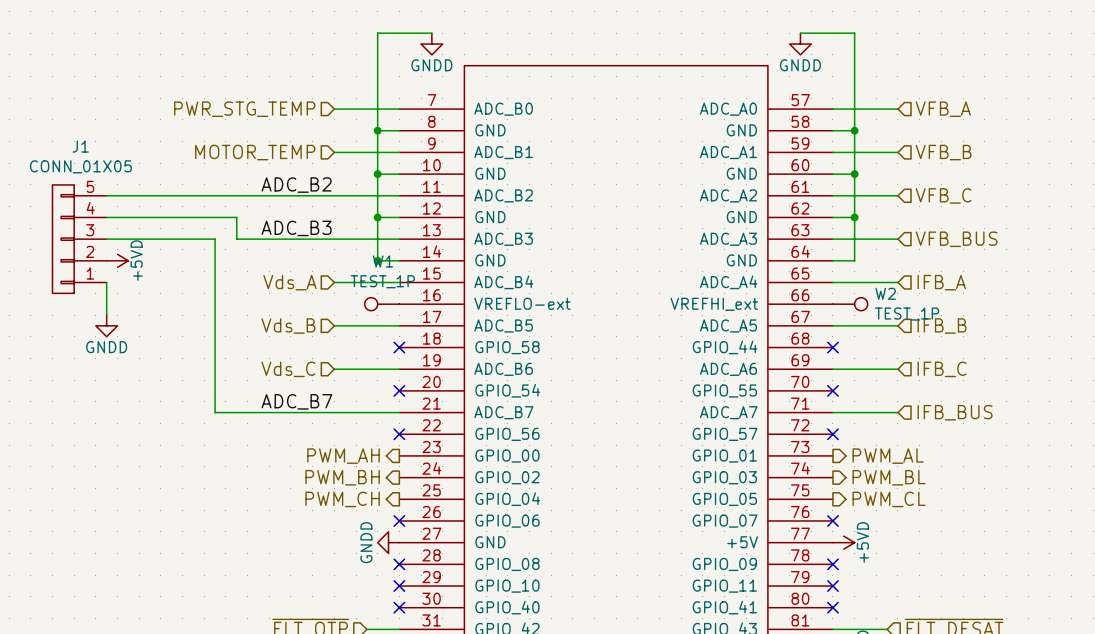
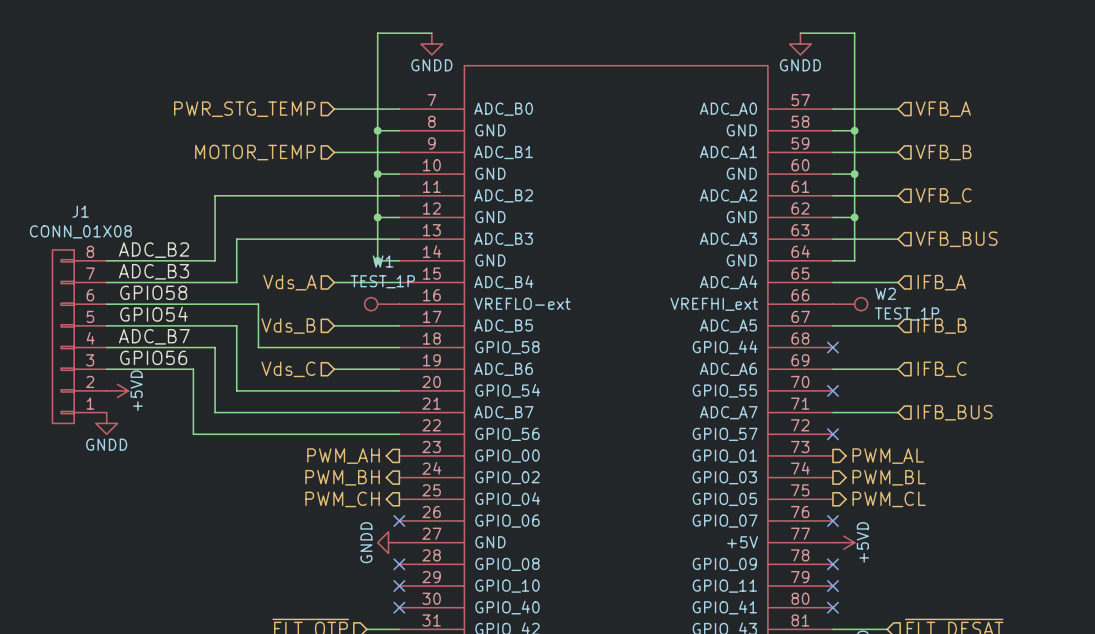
J1 name position: J1 (80, 146) -> J1 (80, 211)
J1 value: CONN_01X05 (80, 166) -> CONN_01X08 (80, 231)
J1 symbol: [52, 184, 107, 294] -> [52, 249, 107, 424]
label: ADC_B2 (296, 185) -> none
wire: (106, 195) (215, 195) -> (215, 239) (215, 195)
wire: (106, 217) (236, 217) (236, 239) -> (106, 282) (236, 282) (236, 239)
label: ADC_B3 (296, 228) -> none
wire: (106, 239) (215, 239) -> (106, 347) (215, 347)
label: none -> ADC_B2 (153, 250)
power symbol position: +5VD (117, 260) -> +5VD (117, 390)
wire: (215, 260) (215, 347) -> (215, 260) (106, 260)
label: none -> ADC_B3 (153, 271)
wire: (106, 282) (106, 315) -> none
label: none -> GPIO58 (153, 292)
wire: none -> (106, 304) (258, 304) (258, 347) (399, 347)
label: none -> GPIO54 (153, 314)
wire: none -> (106, 325) (236, 325) (236, 390) (399, 390)
power symbol position: GNDD (106, 325) -> GNDD (106, 423)
label: none -> ADC_B7 (154, 336)
no-connect mark: (399, 347) -> none
label: none -> GPIO56 (153, 357)
wire: none -> (106, 369) (193, 369) (193, 434) (399, 434)
no-connect mark: (399, 390) -> none
label: ADC_B7 (296, 401) -> none
no-connect mark: (399, 434) -> none

